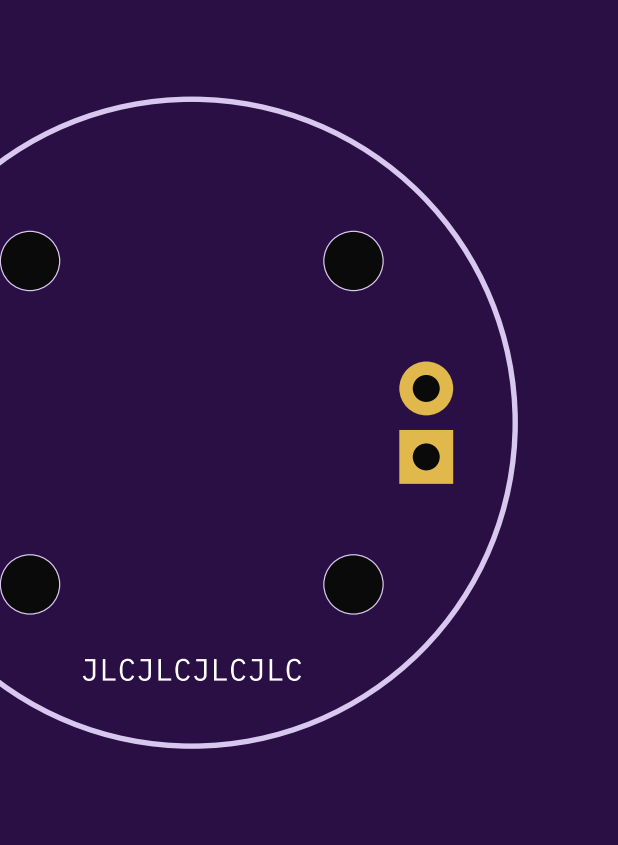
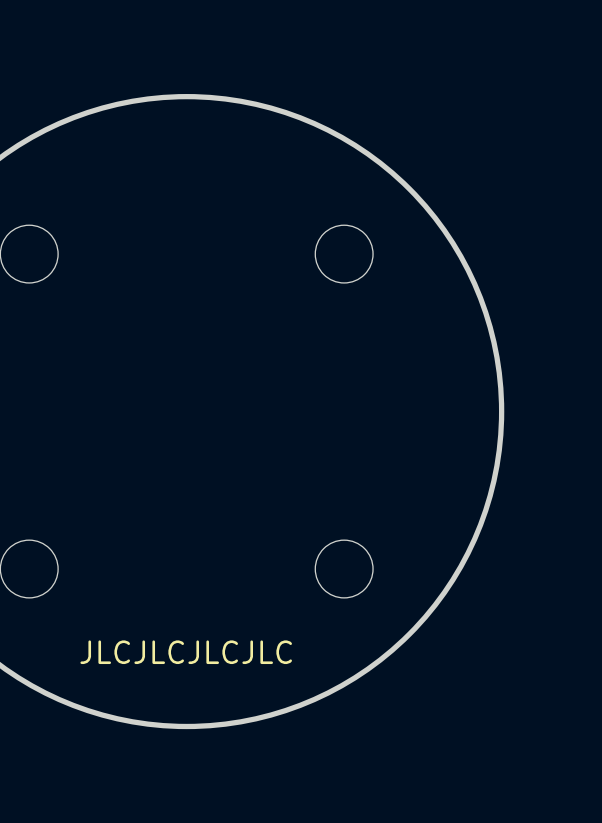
part: (426, 422) -> none

